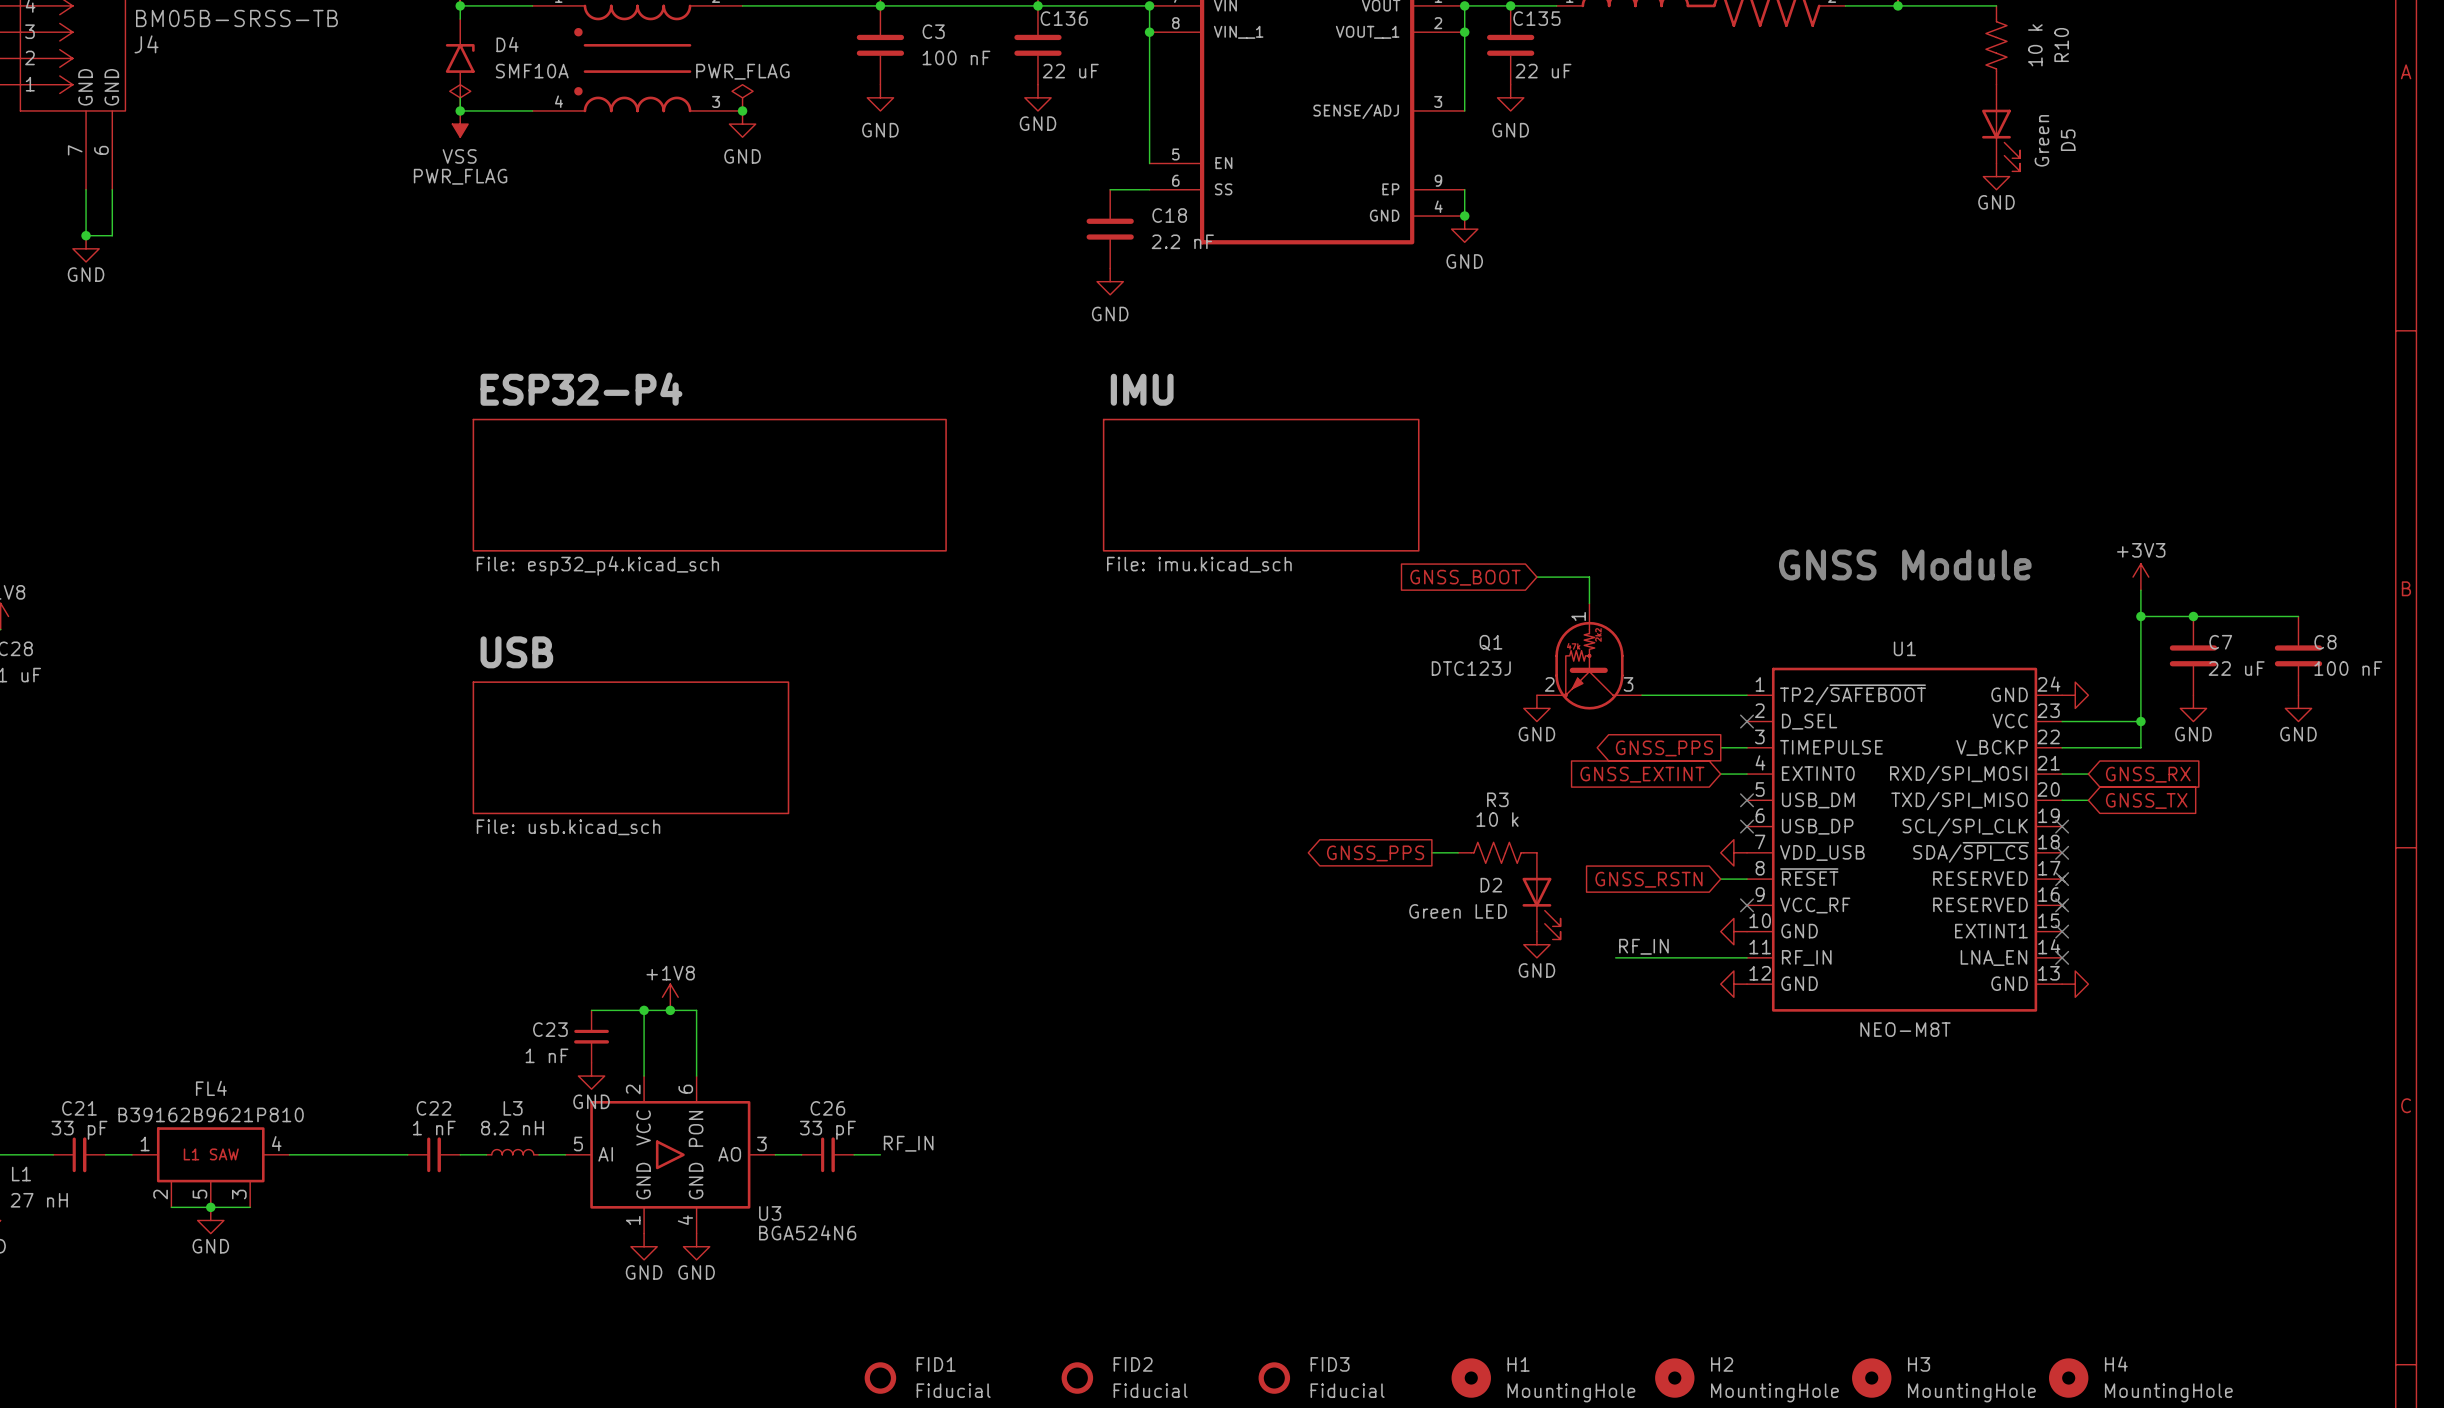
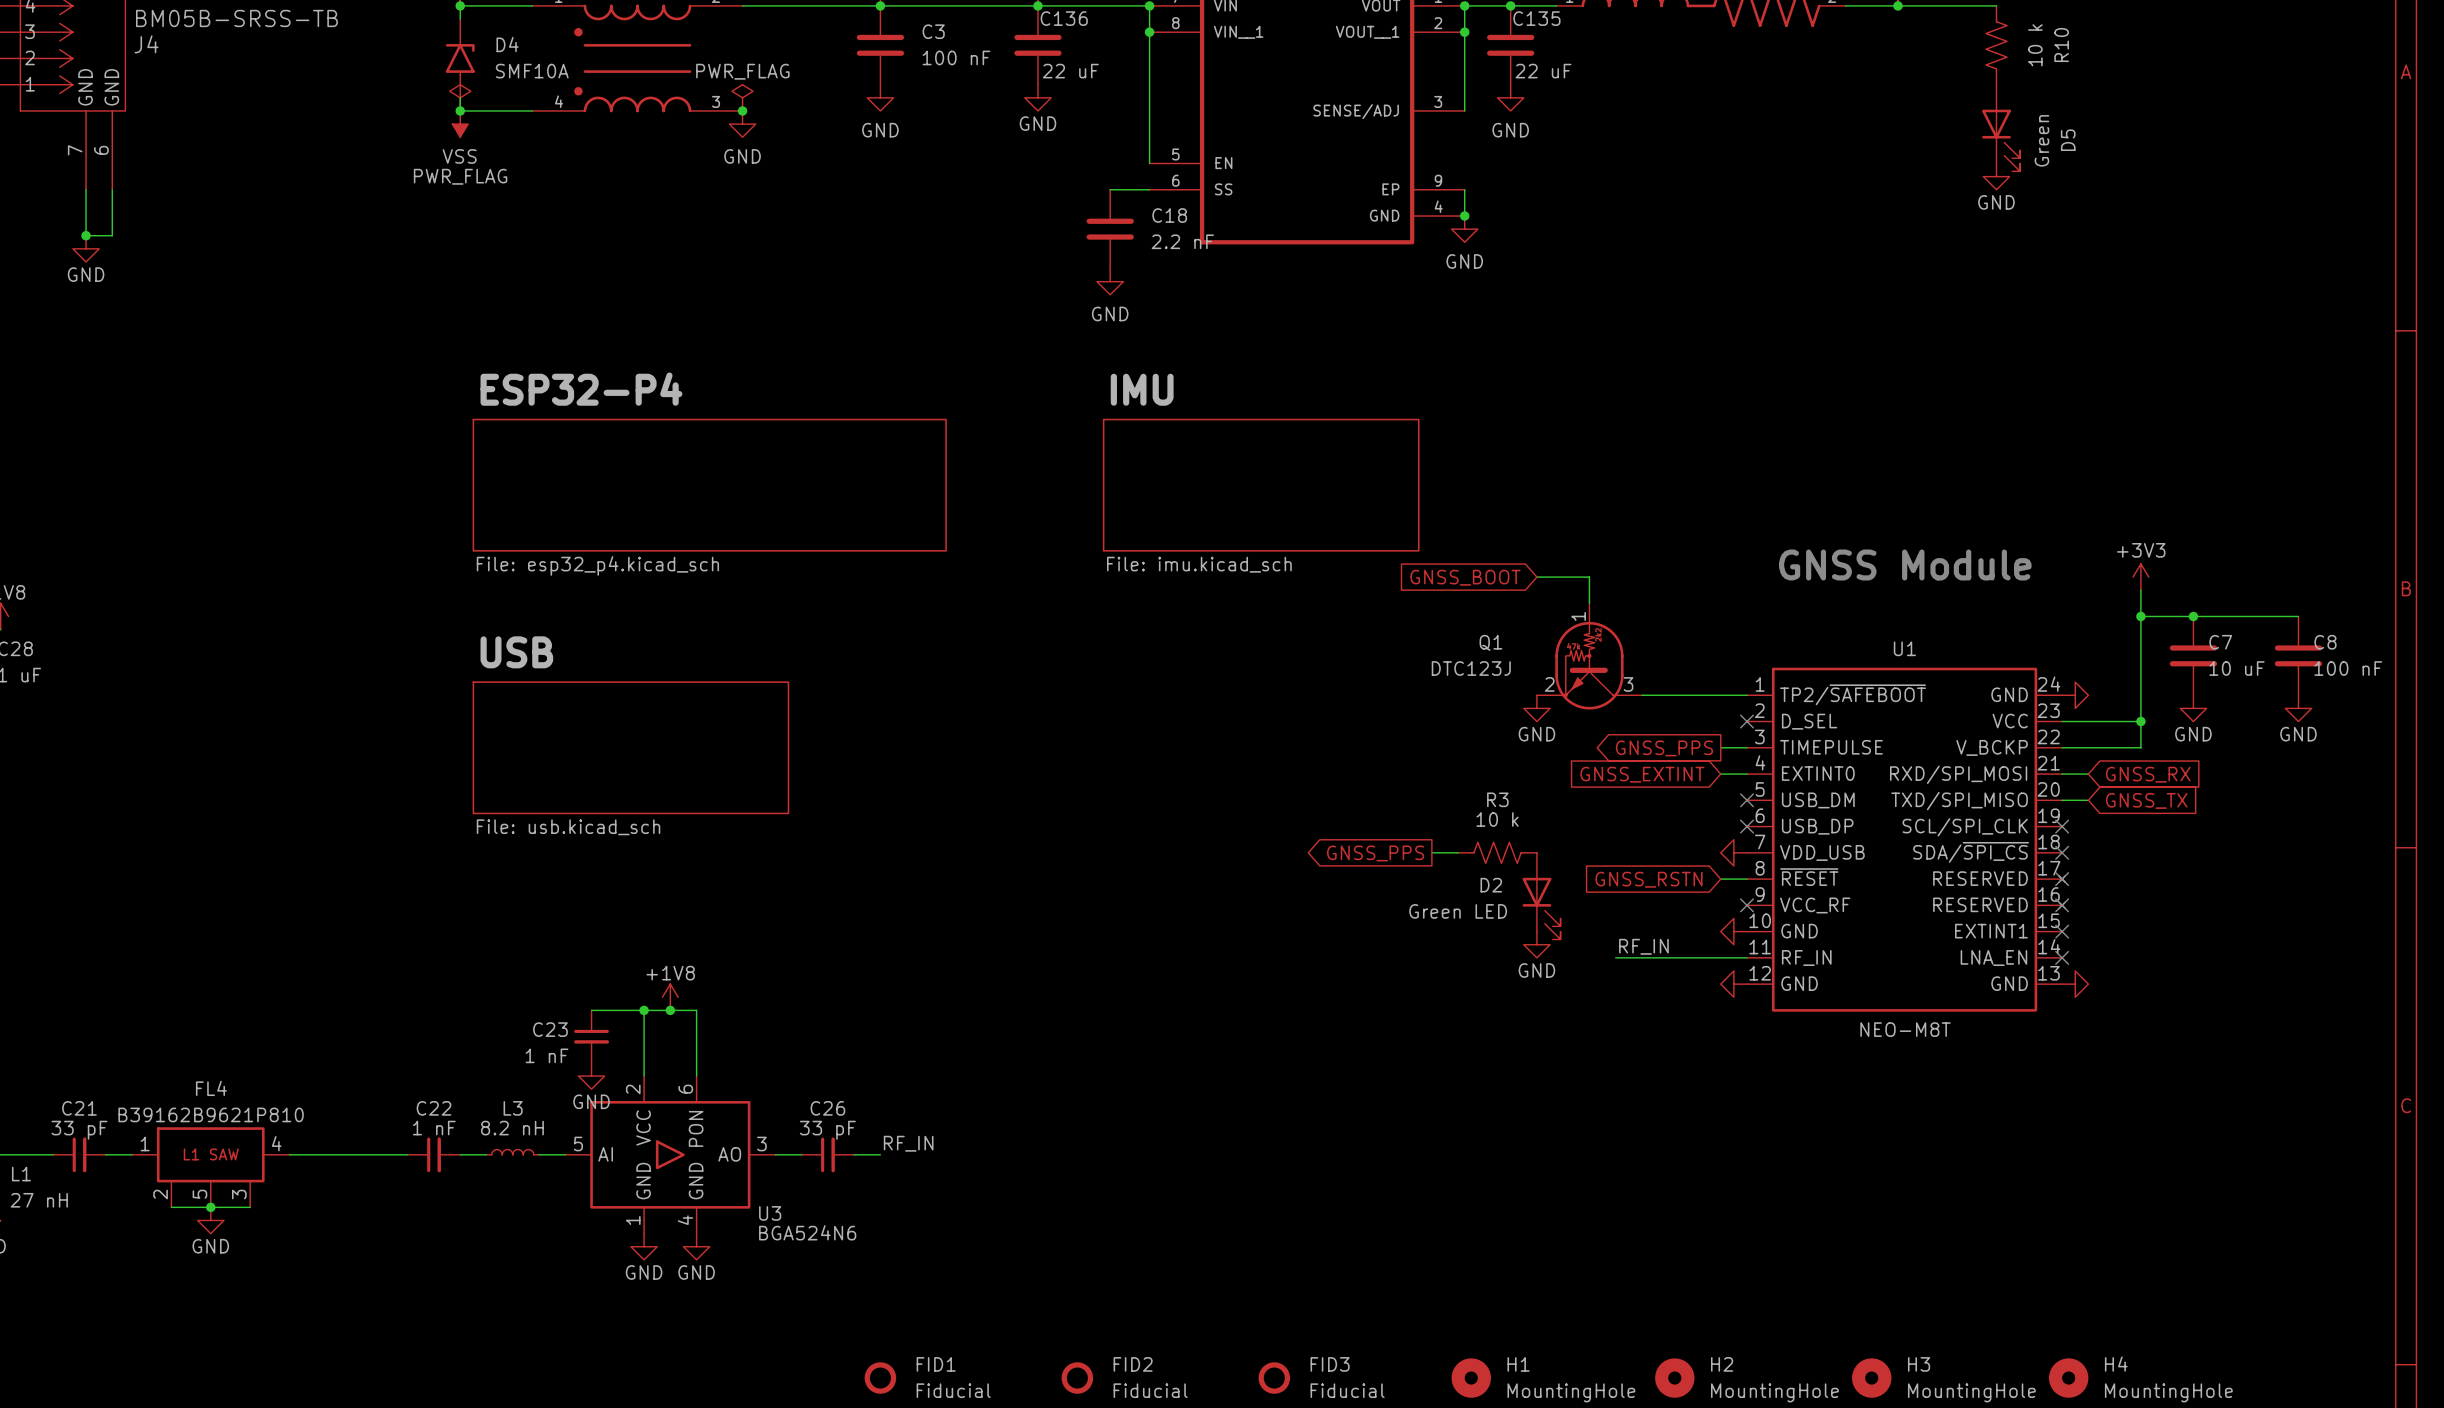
C7 value: 22 uF (2236, 668) -> 10 uF (2236, 668)

